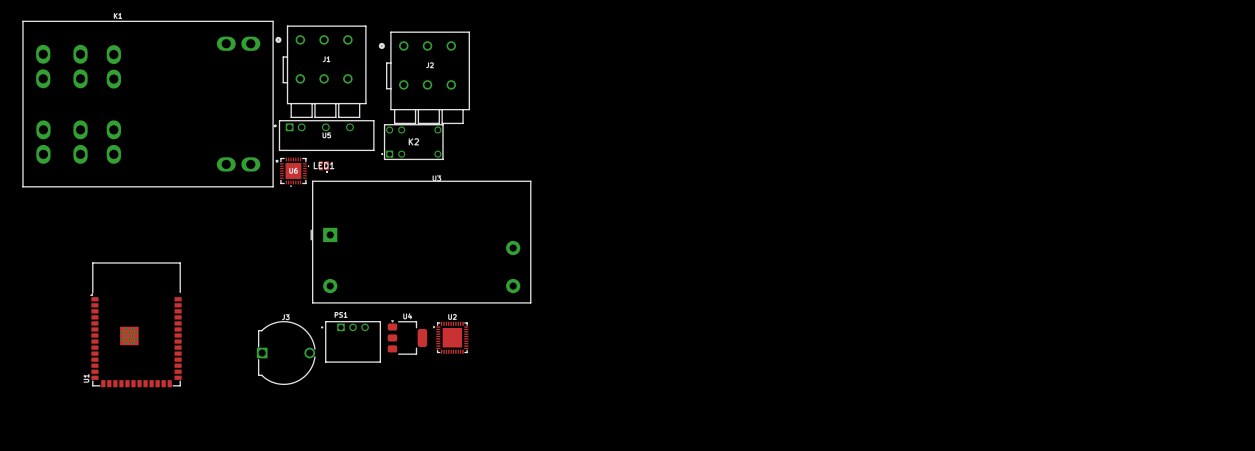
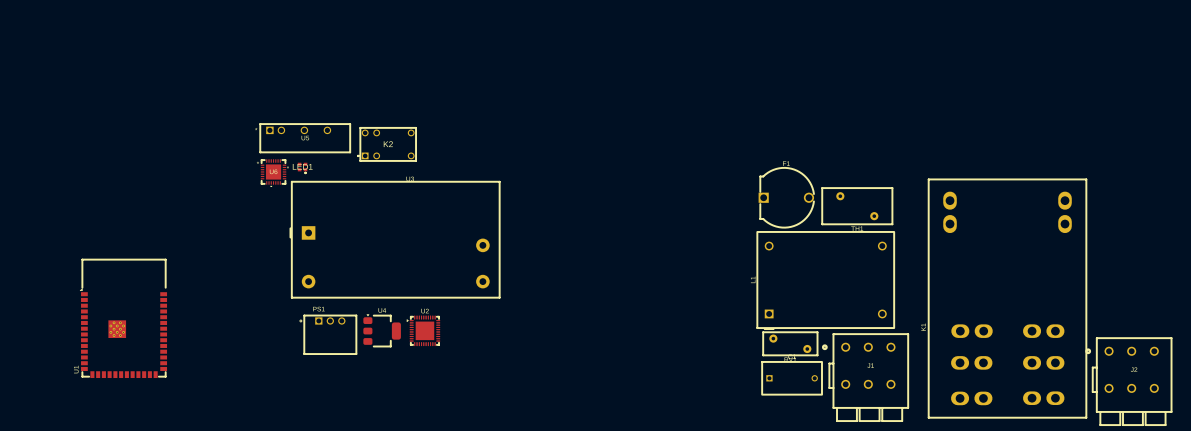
part position: (320, 71) -> (865, 377)
part position: (424, 77) -> (1128, 381)
part rotation: 0° (148, 104) -> 90° counterclockwise (1007, 298)
part position: (148, 104) -> (1007, 298)
part: none -> (786, 197)
part: none -> (857, 206)
part: none -> (825, 280)
part: none -> (790, 343)
part: (286, 353) -> none
part: none -> (792, 378)

